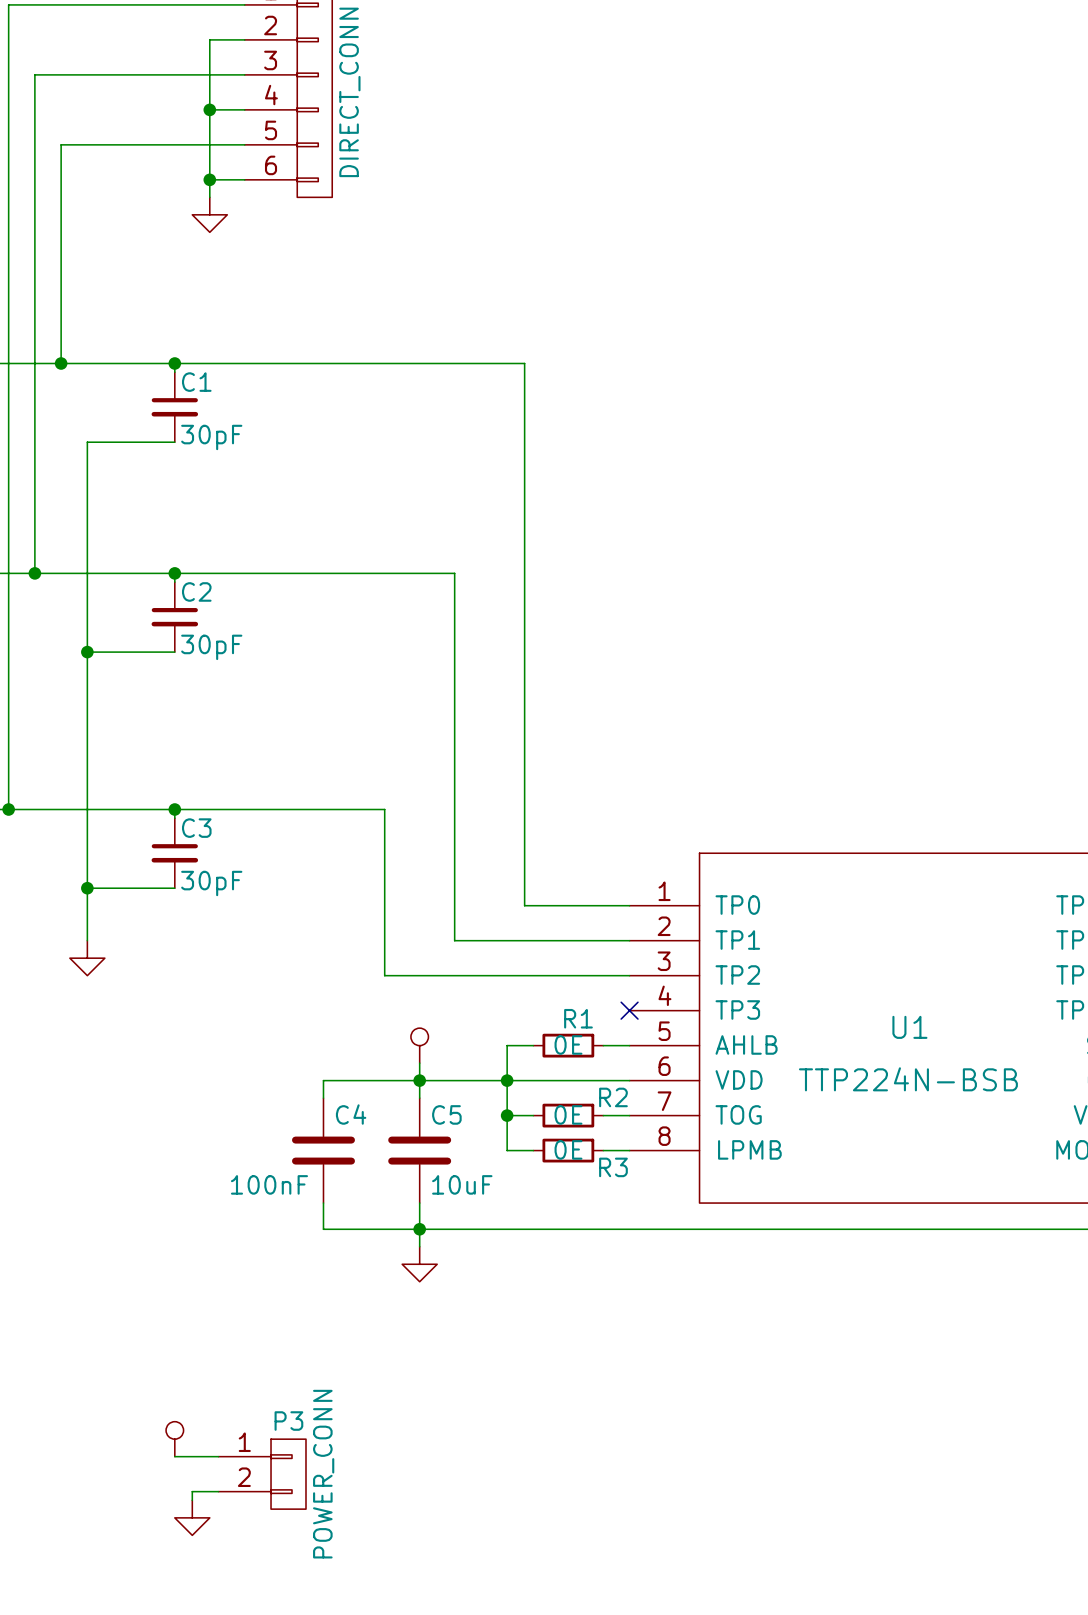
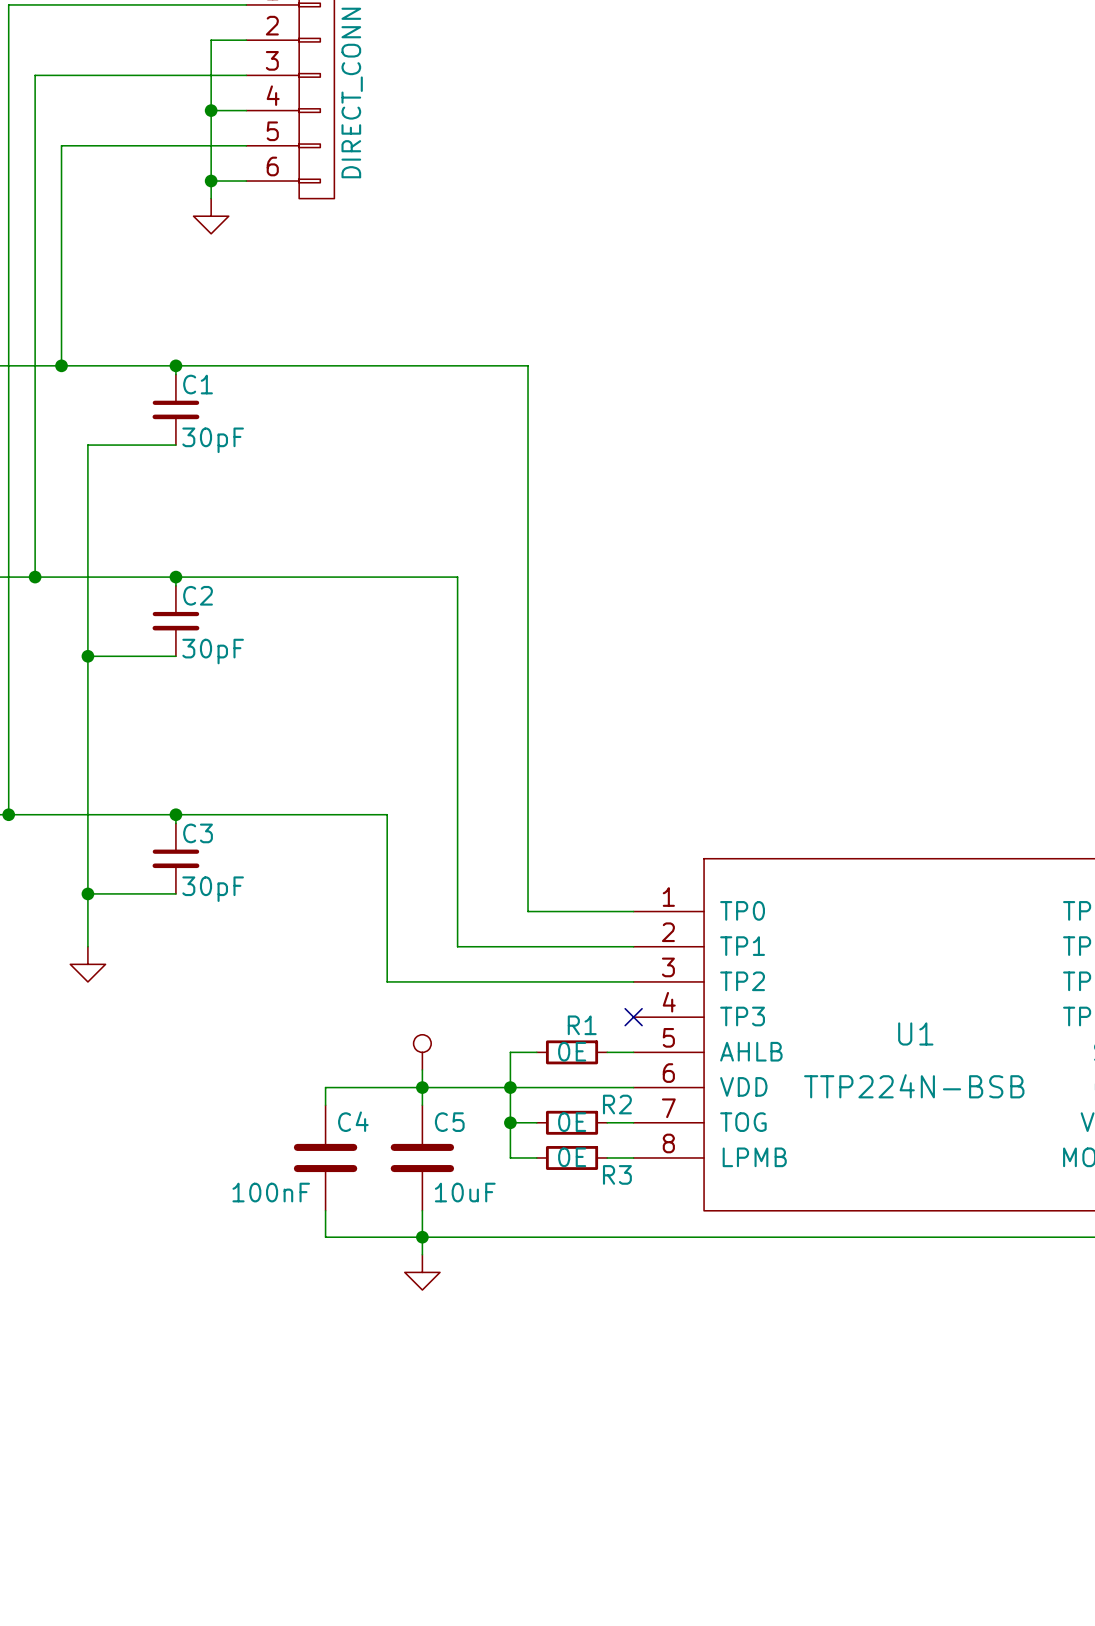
power symbol: (174, 1439) -> none
wire: (174, 1456) (218, 1456) -> none
P3: POWER_CONN (262, 1474) -> none
wire: (218, 1491) (192, 1491) (192, 1500) -> none
power symbol: (192, 1517) -> none

